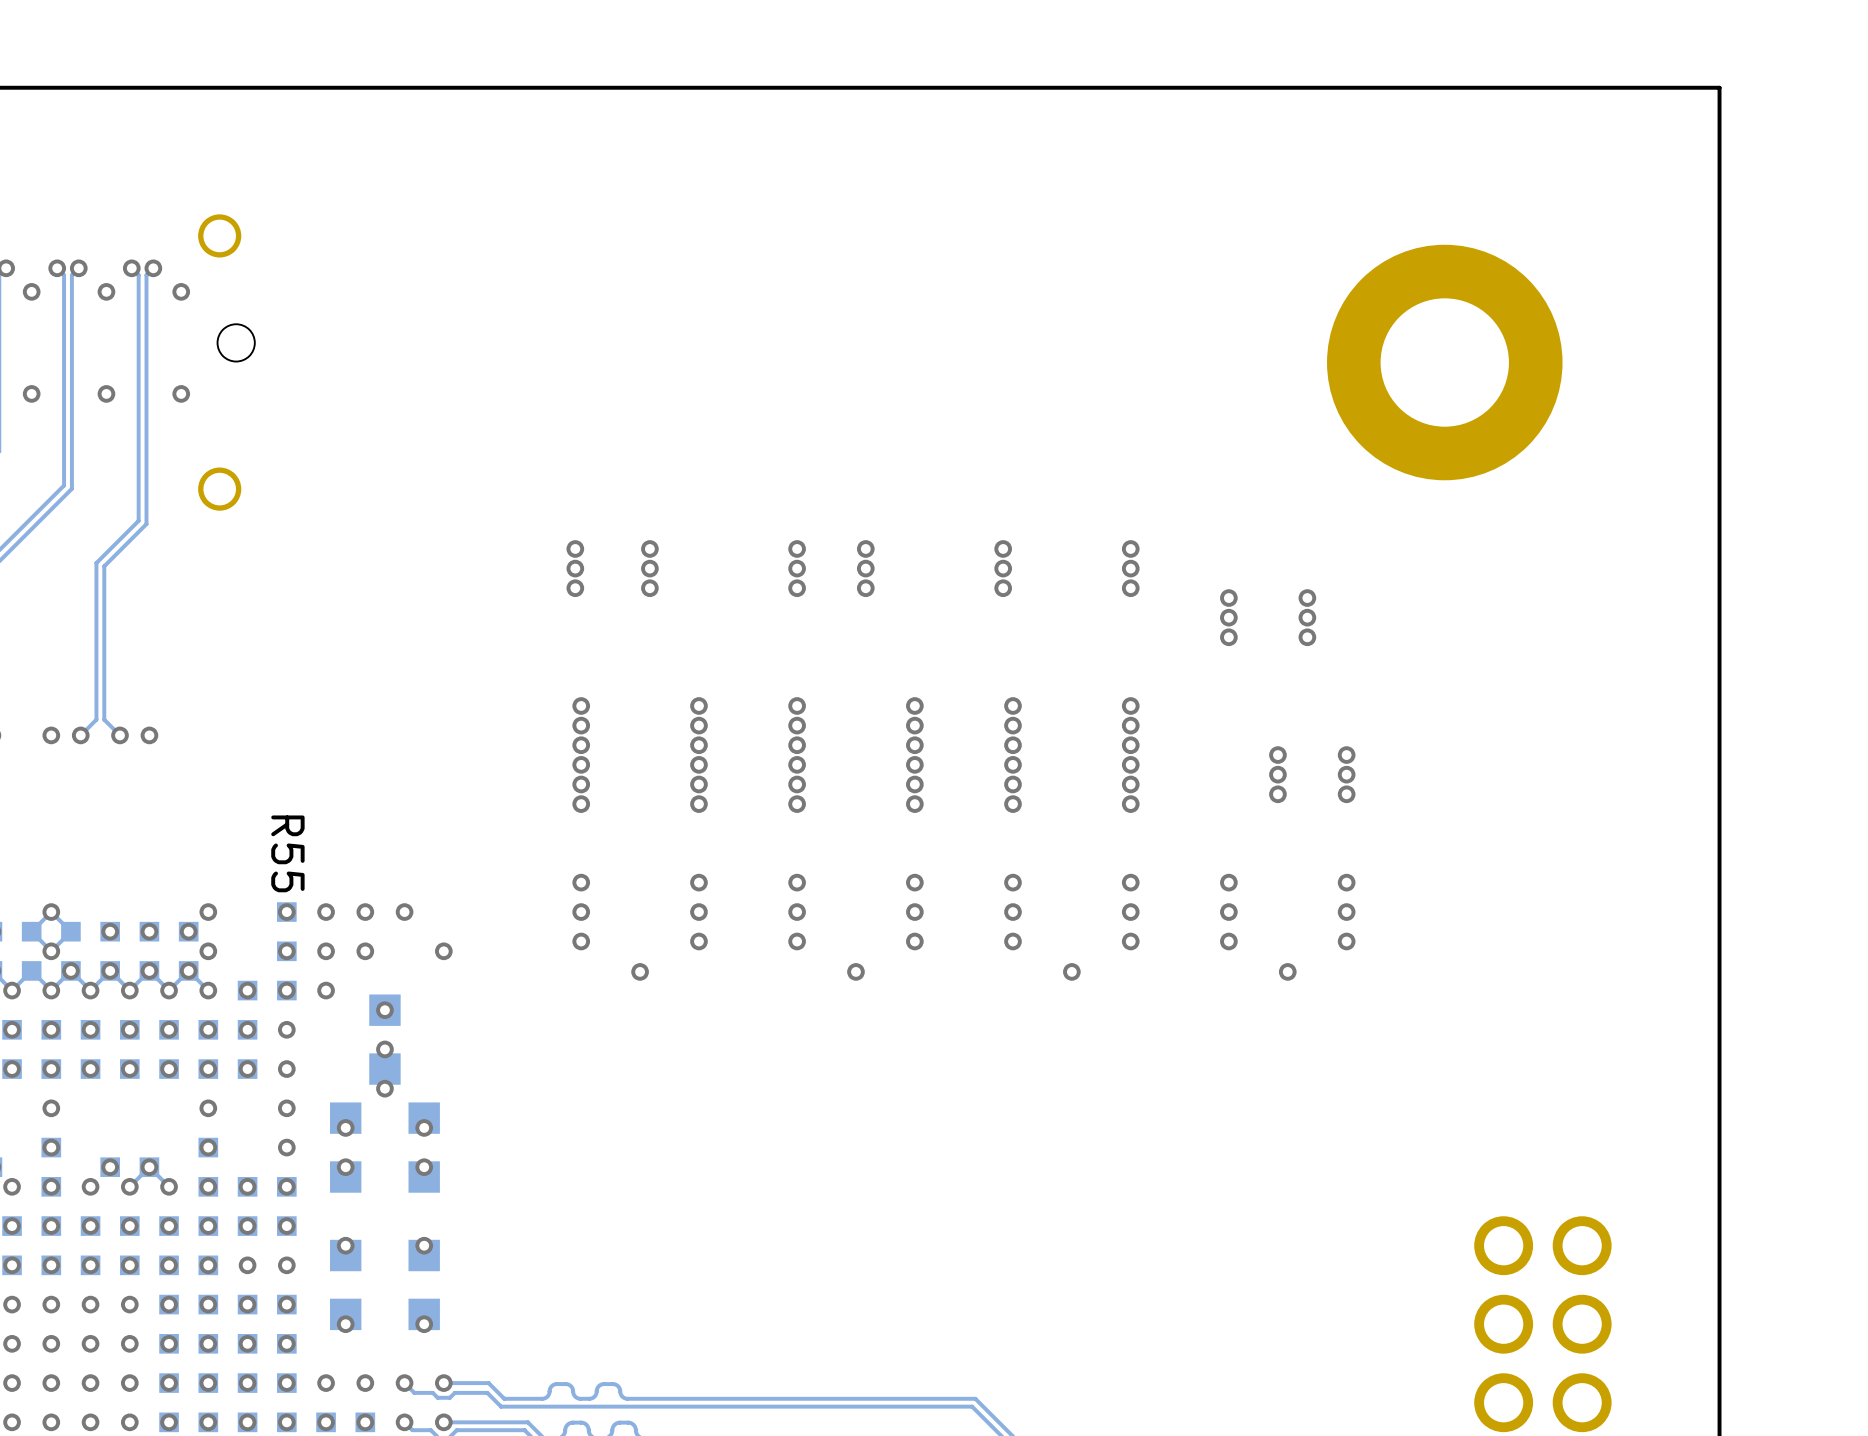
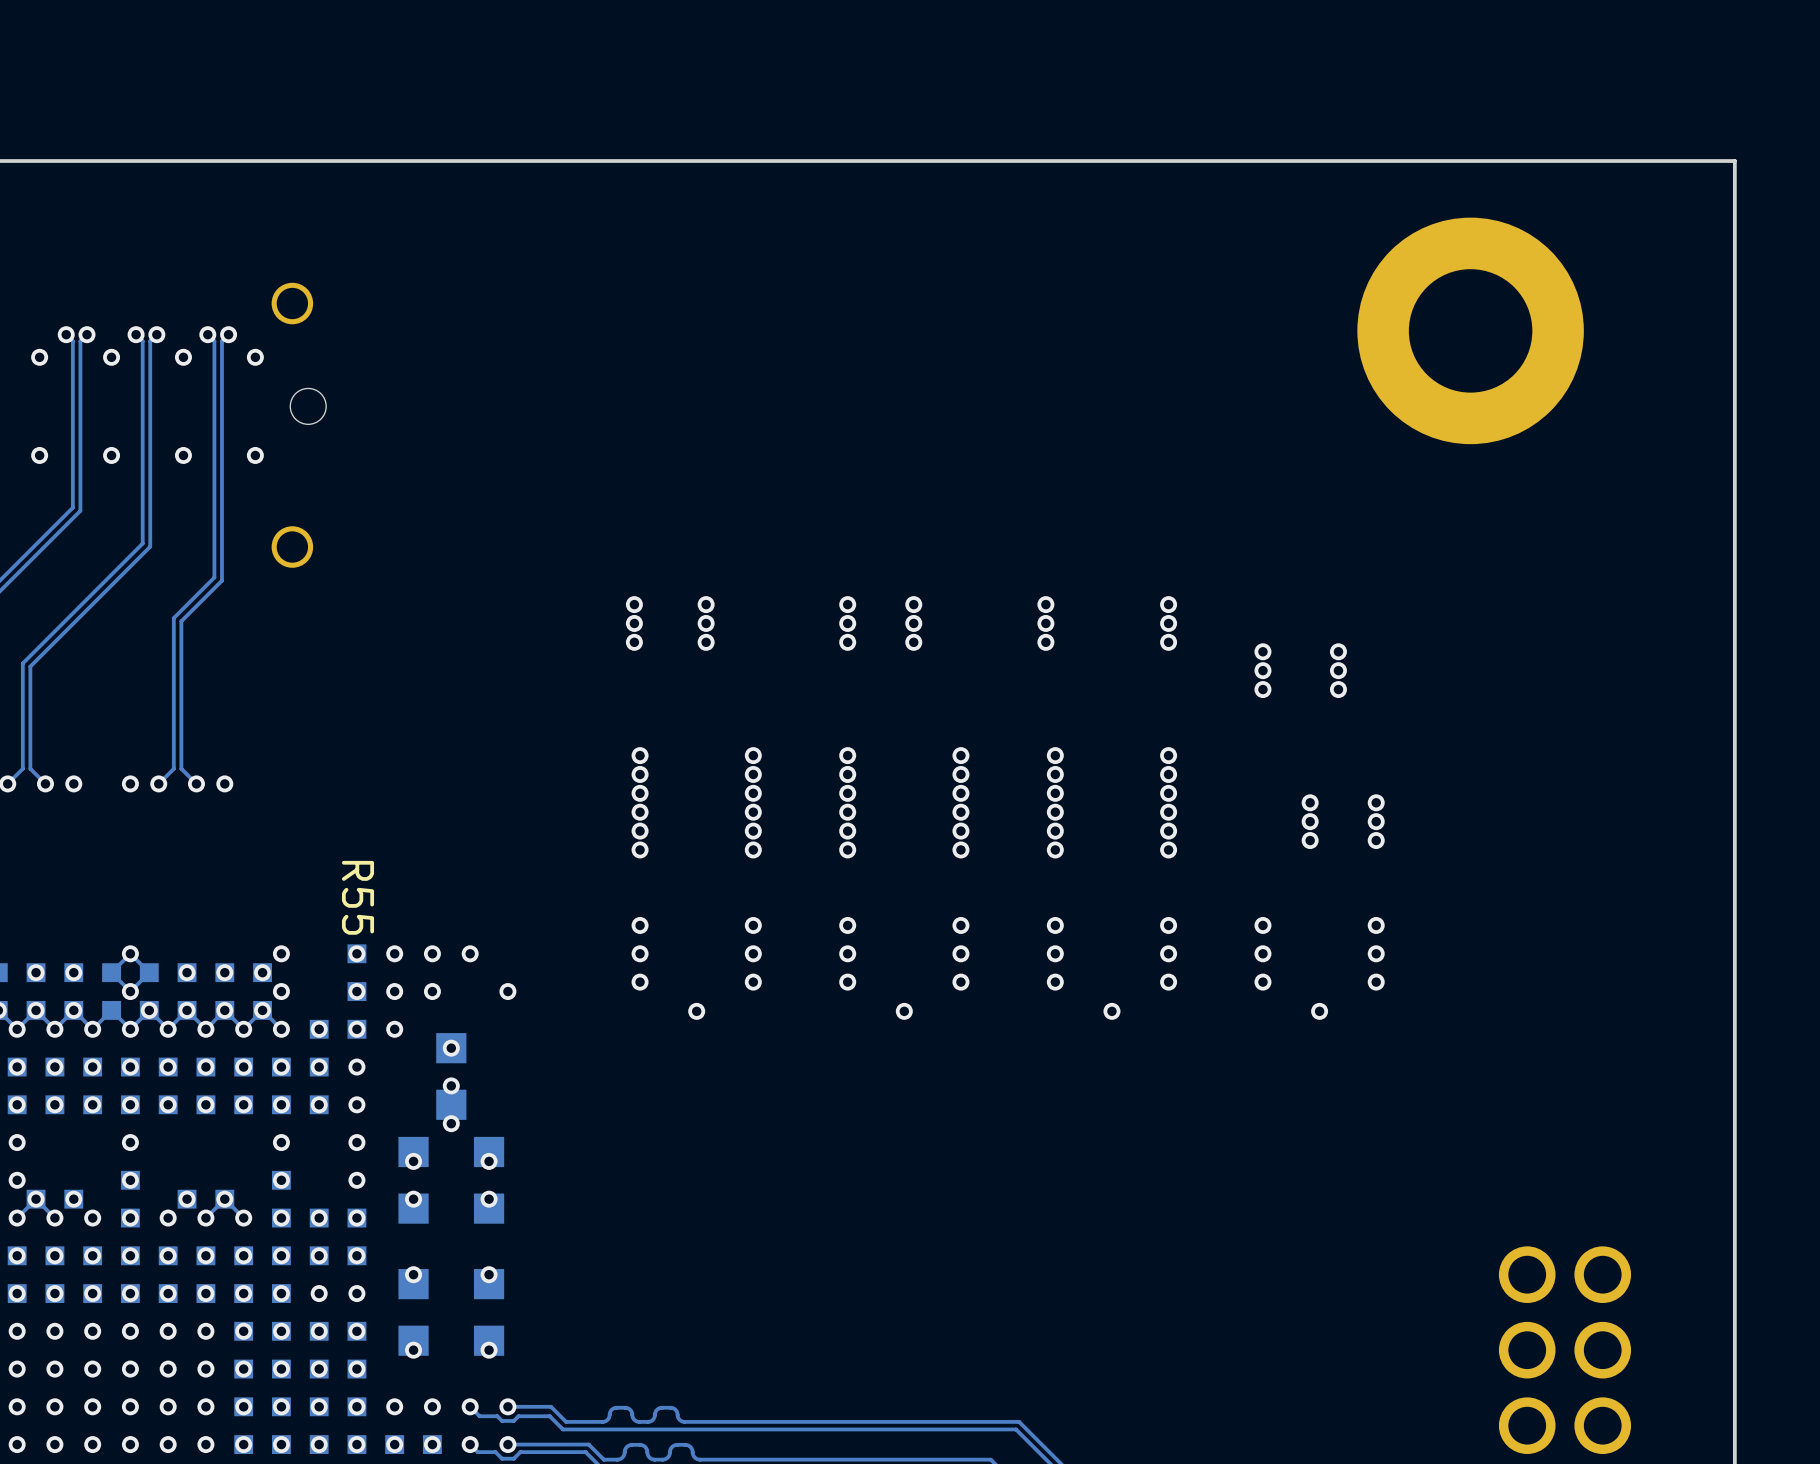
part position: (1444, 362) -> (1470, 330)

